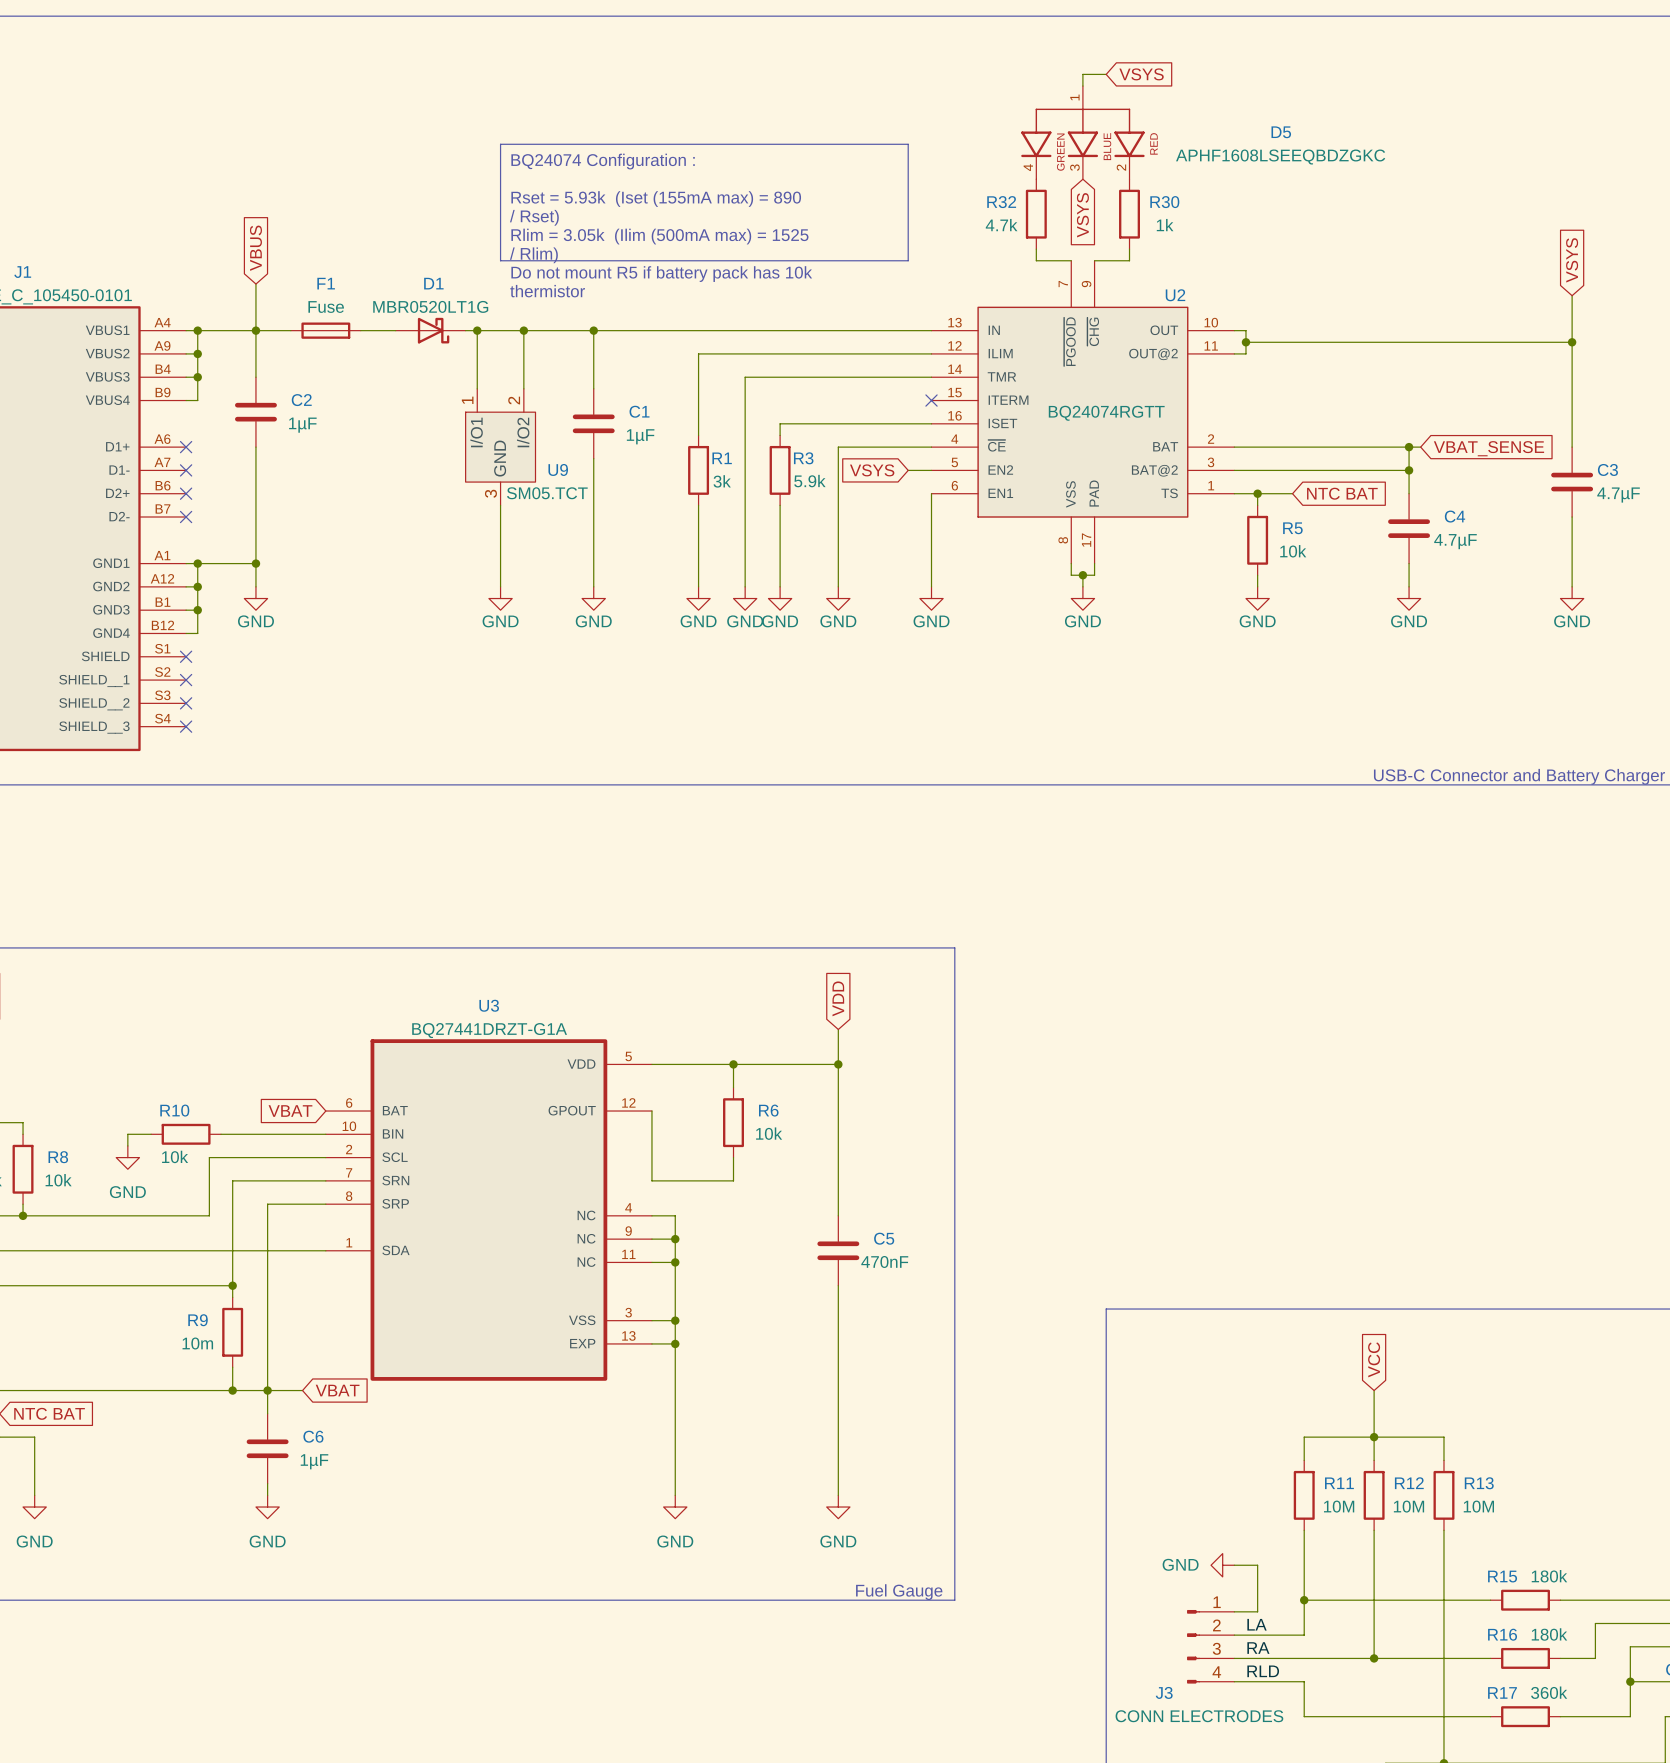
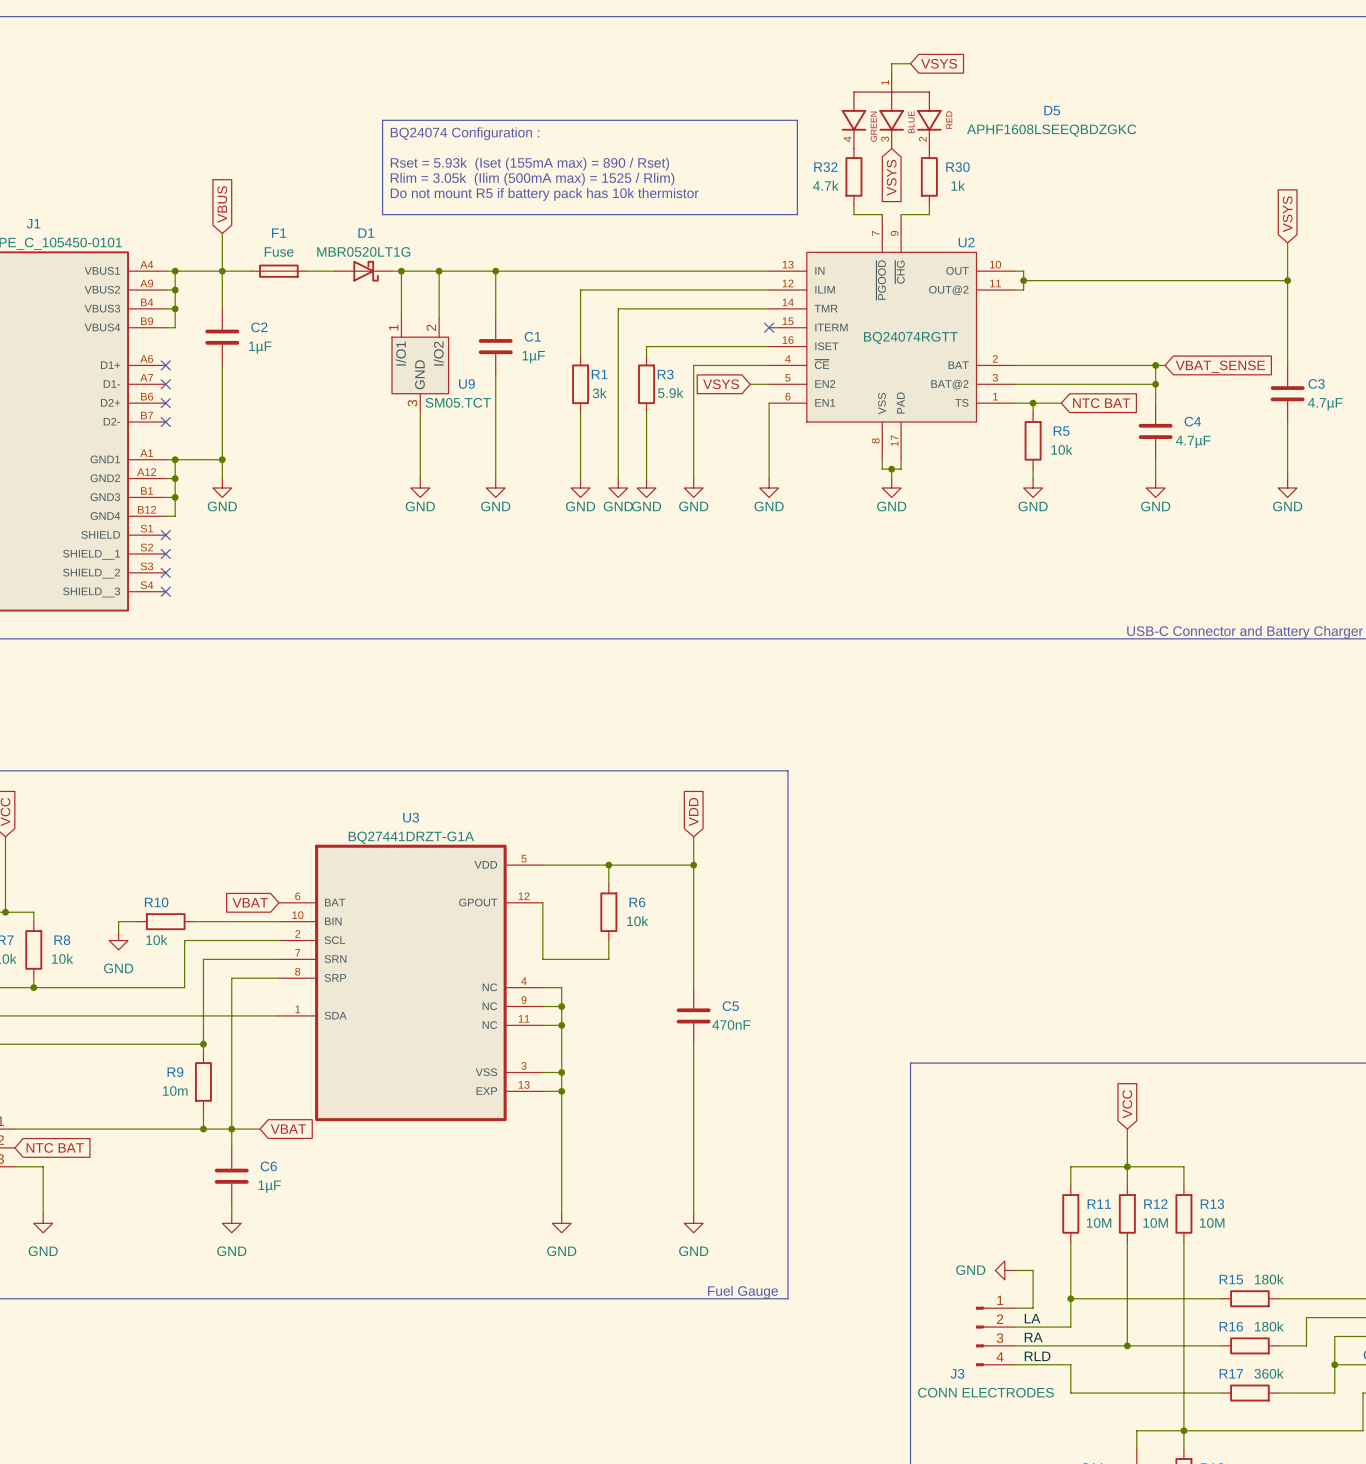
line: (500, 144) (500, 260) -> (420, 120) (382, 120) (382, 214) (420, 214)
line: (908, 144) (908, 260) -> (750, 120) (797, 120) (797, 214) (750, 214)
text position: BQ24074 Configuration : (603, 161) -> BQ24074 Configuration : (465, 133)
text: Rset = 5.93k (Iset (155mA max) = 890 (656, 199) -> Rset = 5.93k (Iset (155mA max) = 890 / Rset) (529, 164)
text: / Rset) (534, 217) -> none
text: none -> Do not mount R5 if battery pack has 10k thermistor (544, 194)
text: Rlim = 3.05k (Ilim (500mA max) = 1525 (659, 236) -> Rlim = 3.05k (Ilim (500mA max) = 1525 / Rlim) (532, 179)
text: / Rlim) (533, 255) -> none
text: Do not mount R5 if battery pack has 10k (661, 274) -> none
text: thermistor (547, 291) -> none

